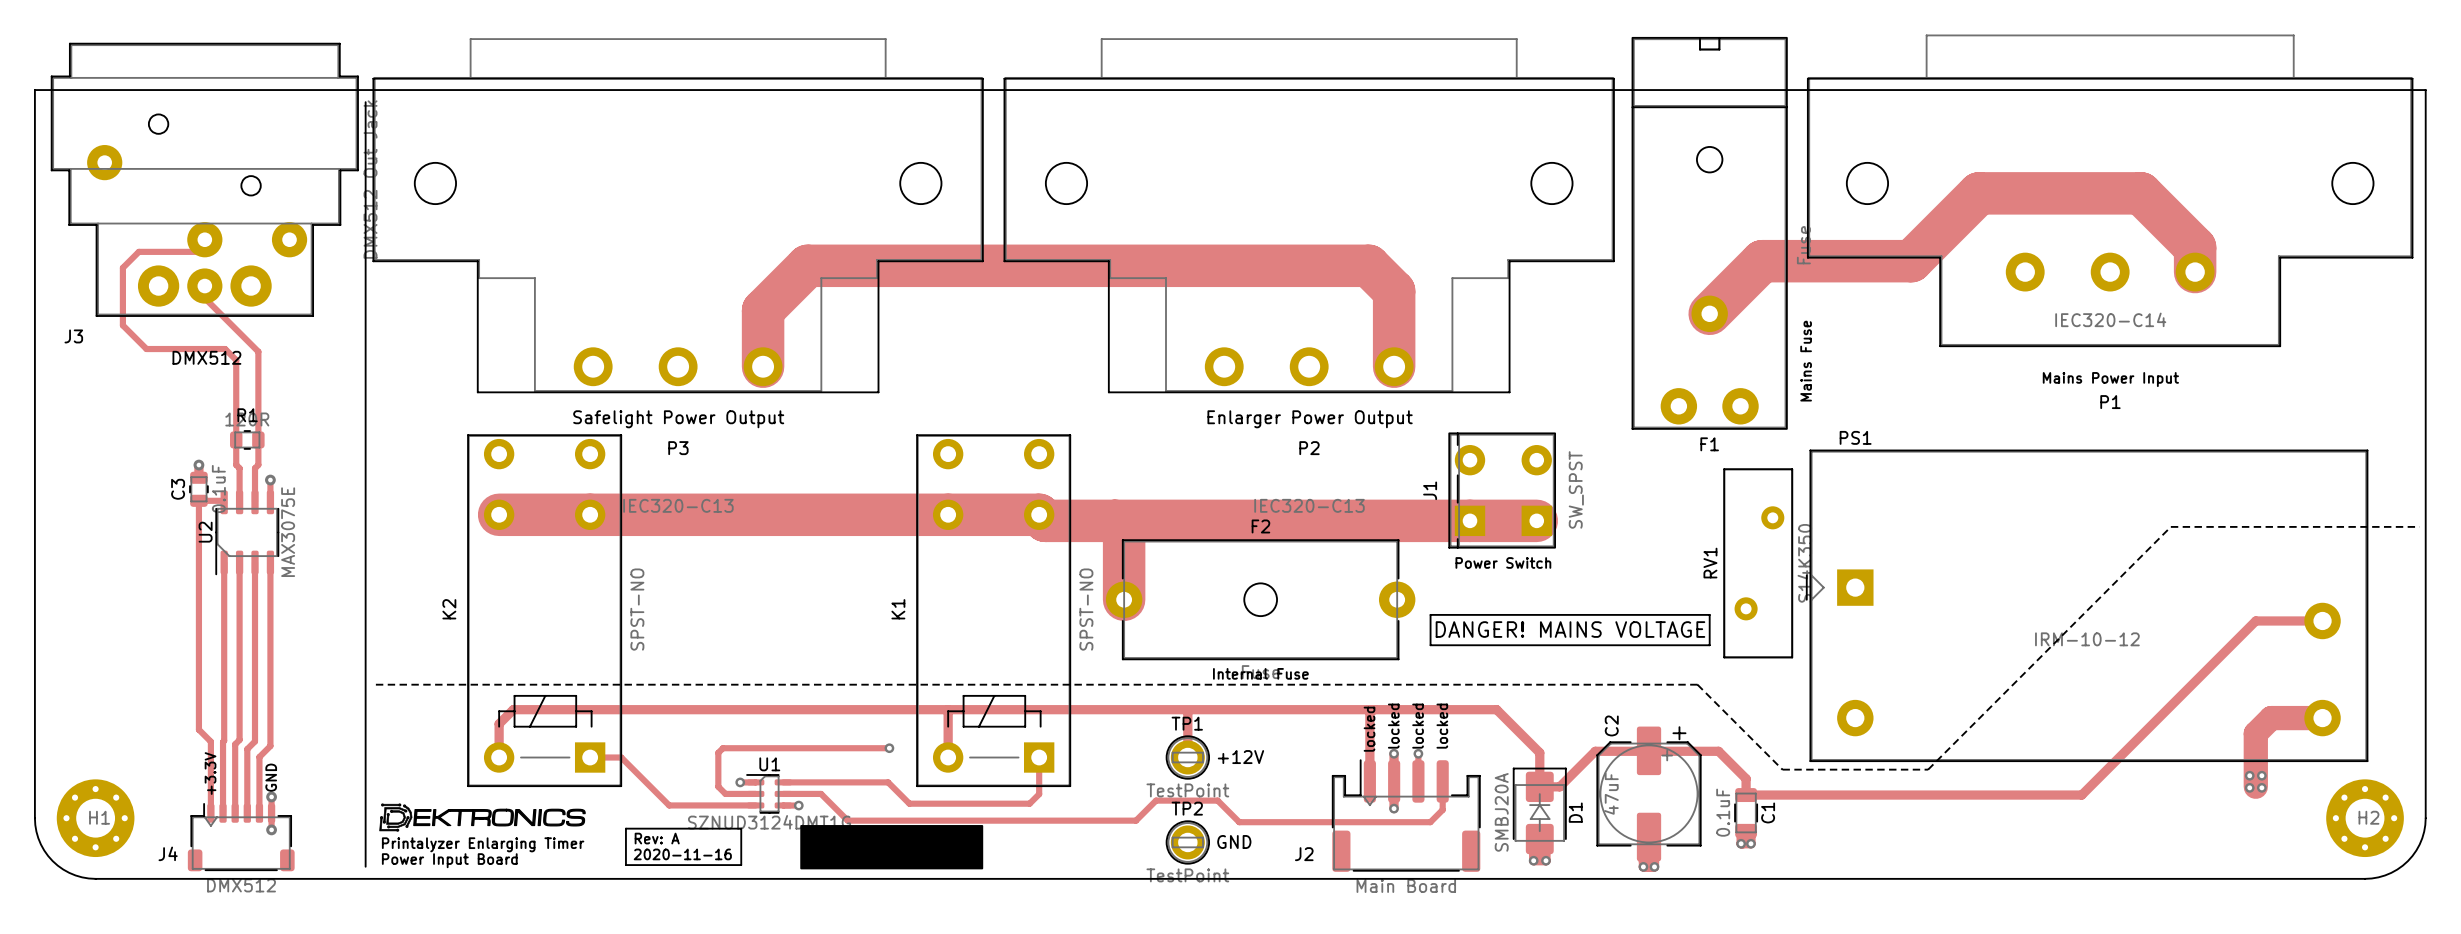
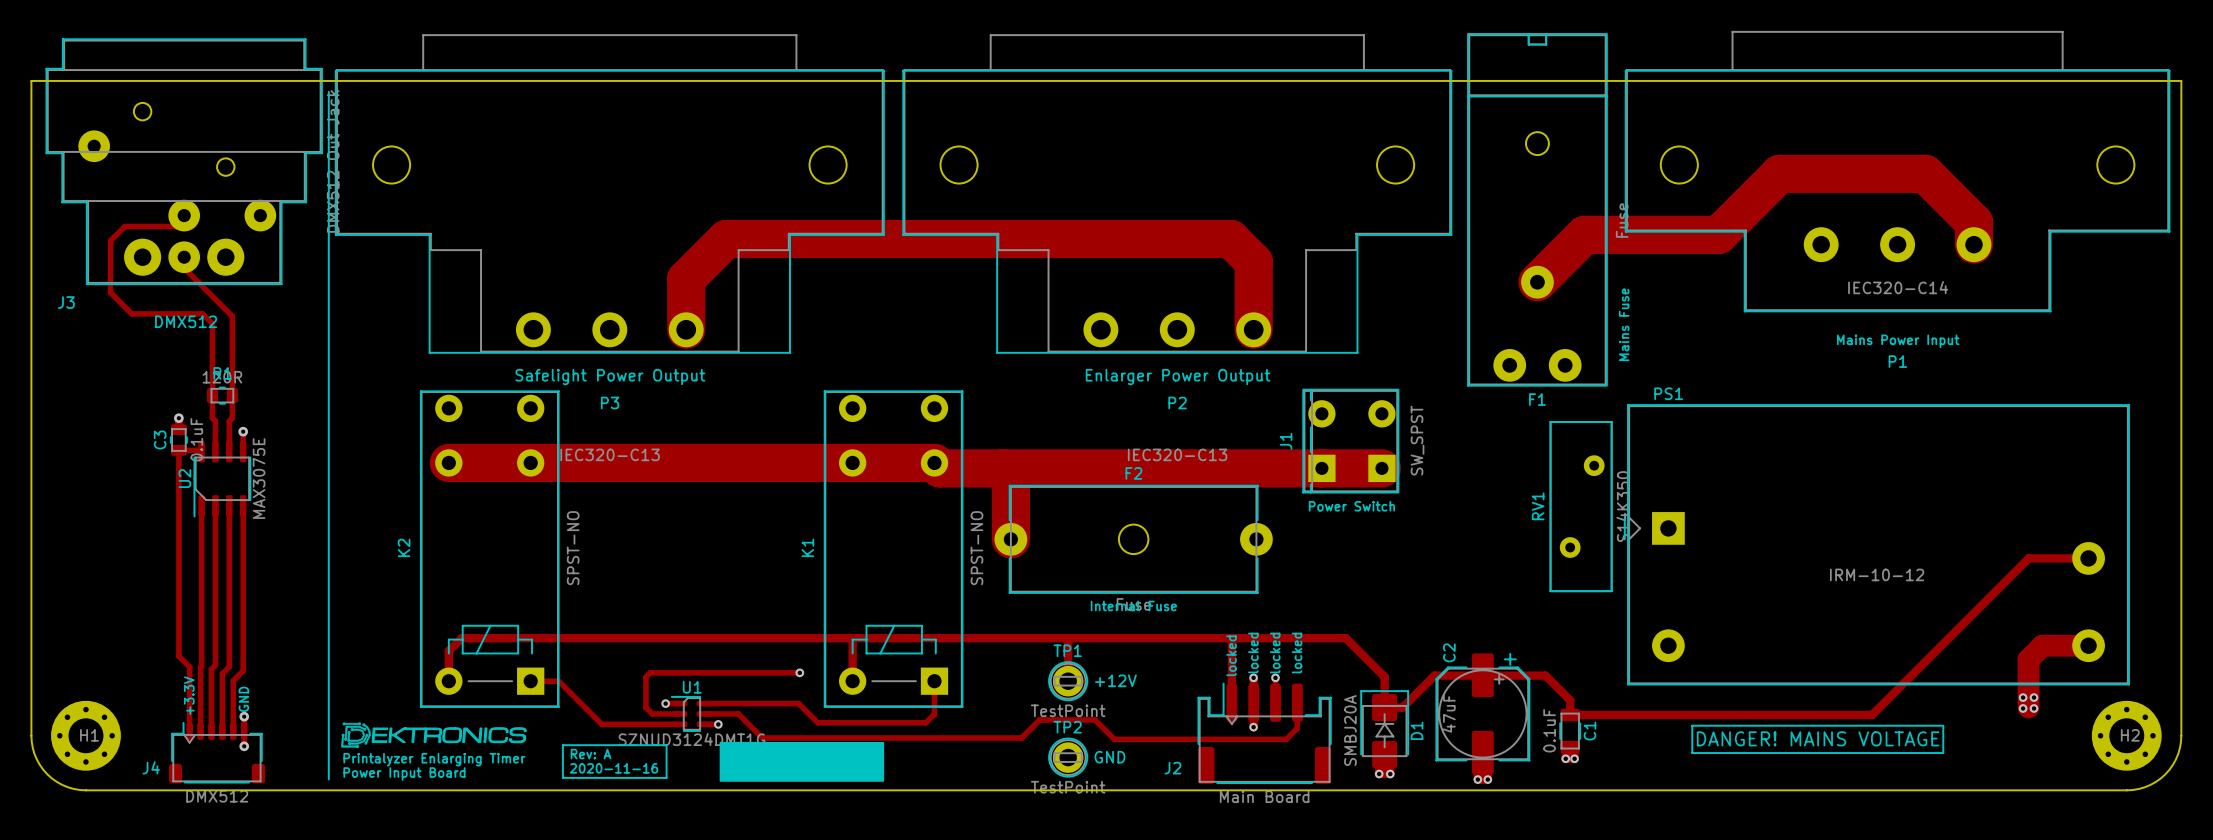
line: (2419, 526) (2170, 526) (1928, 769) (1782, 769) (1697, 684) (374, 684) -> none
line: (1430, 614) (1709, 614) (1709, 645) (1430, 645) (1430, 614) -> none
text: DANGER! MAINS VOLTAGE (1570, 629) -> none
line: none -> (1692, 725) (1943, 725) (1943, 753) (1692, 753) (1692, 725)
text: none -> DANGER! MAINS VOLTAGE (1818, 738)

